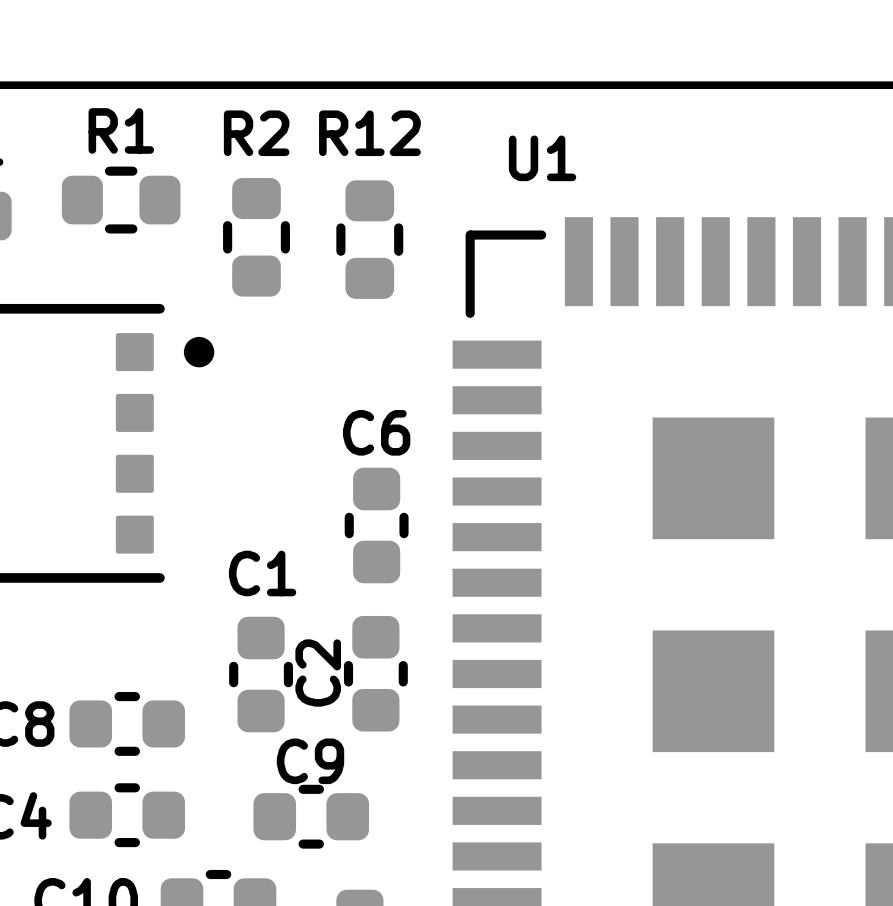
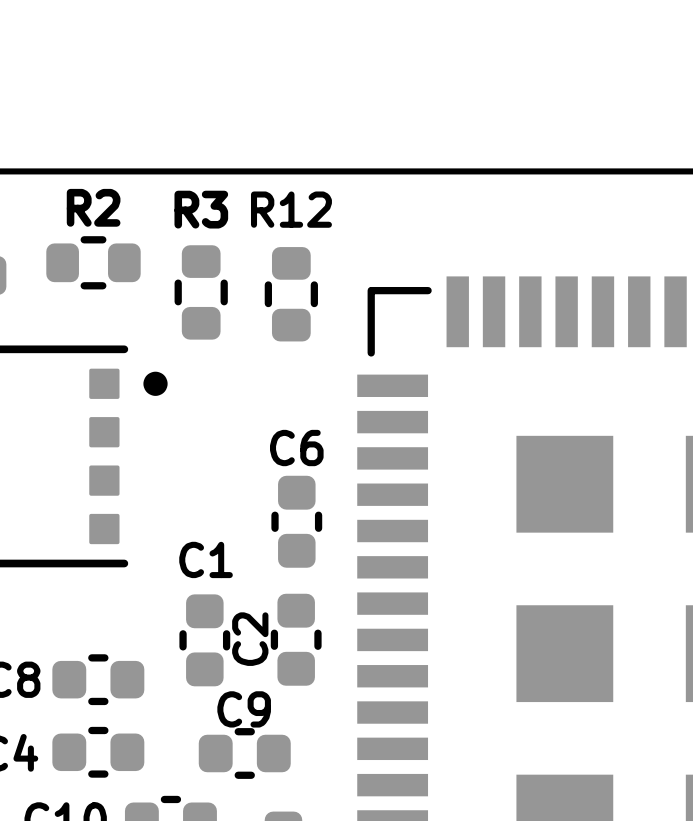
R1 name: R1 (121, 130) -> R2 (93, 207)
R2 name: R2 (256, 133) -> R3 (201, 209)
U1 name: U1 (542, 158) -> none

